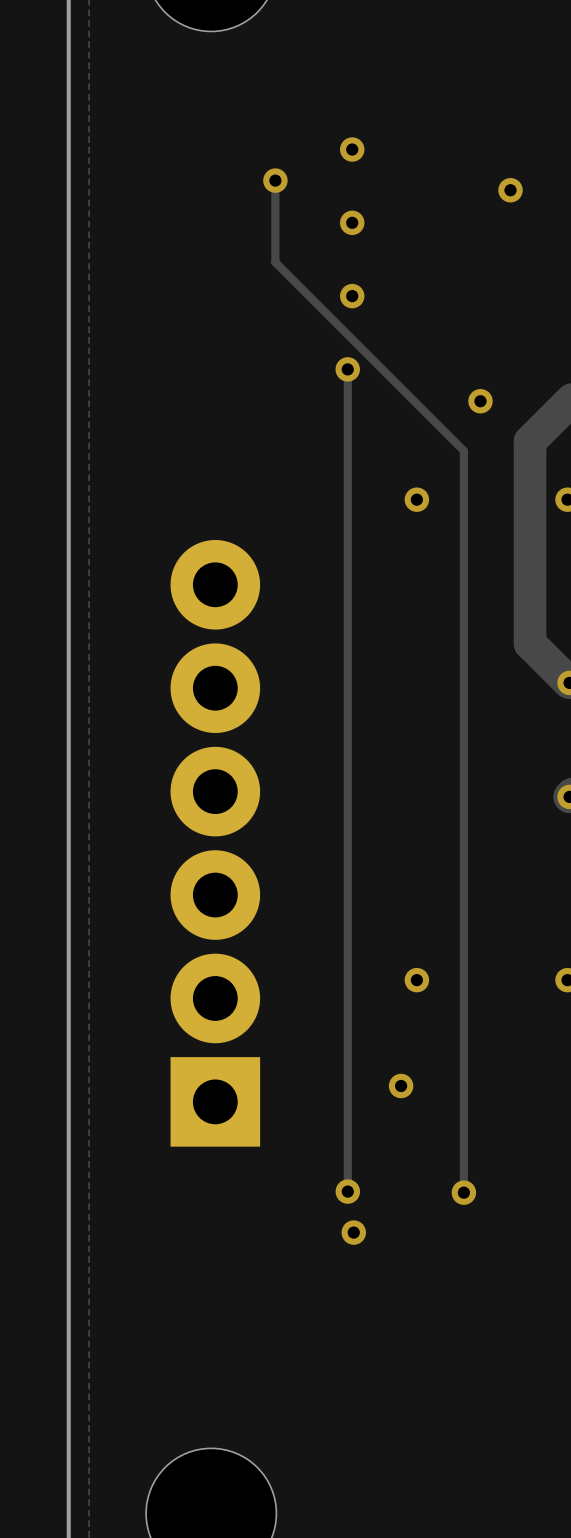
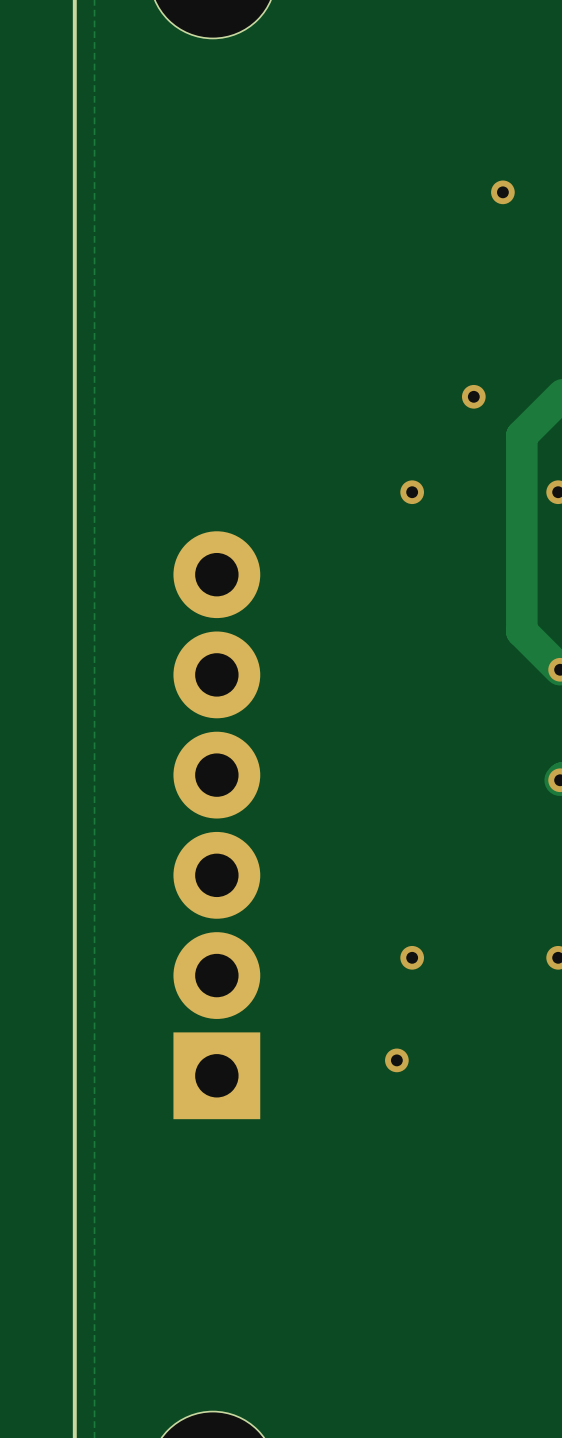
via: (352, 149) -> none
track: (275, 180) (275, 262) (463, 450) (463, 1192) -> none
via: (275, 180) -> none
via: (352, 222) -> none
via: (352, 296) -> none
track: (347, 369) (347, 1191) -> none
via: (347, 369) -> none
via: (347, 1191) -> none
via: (463, 1192) -> none
via: (353, 1232) -> none

